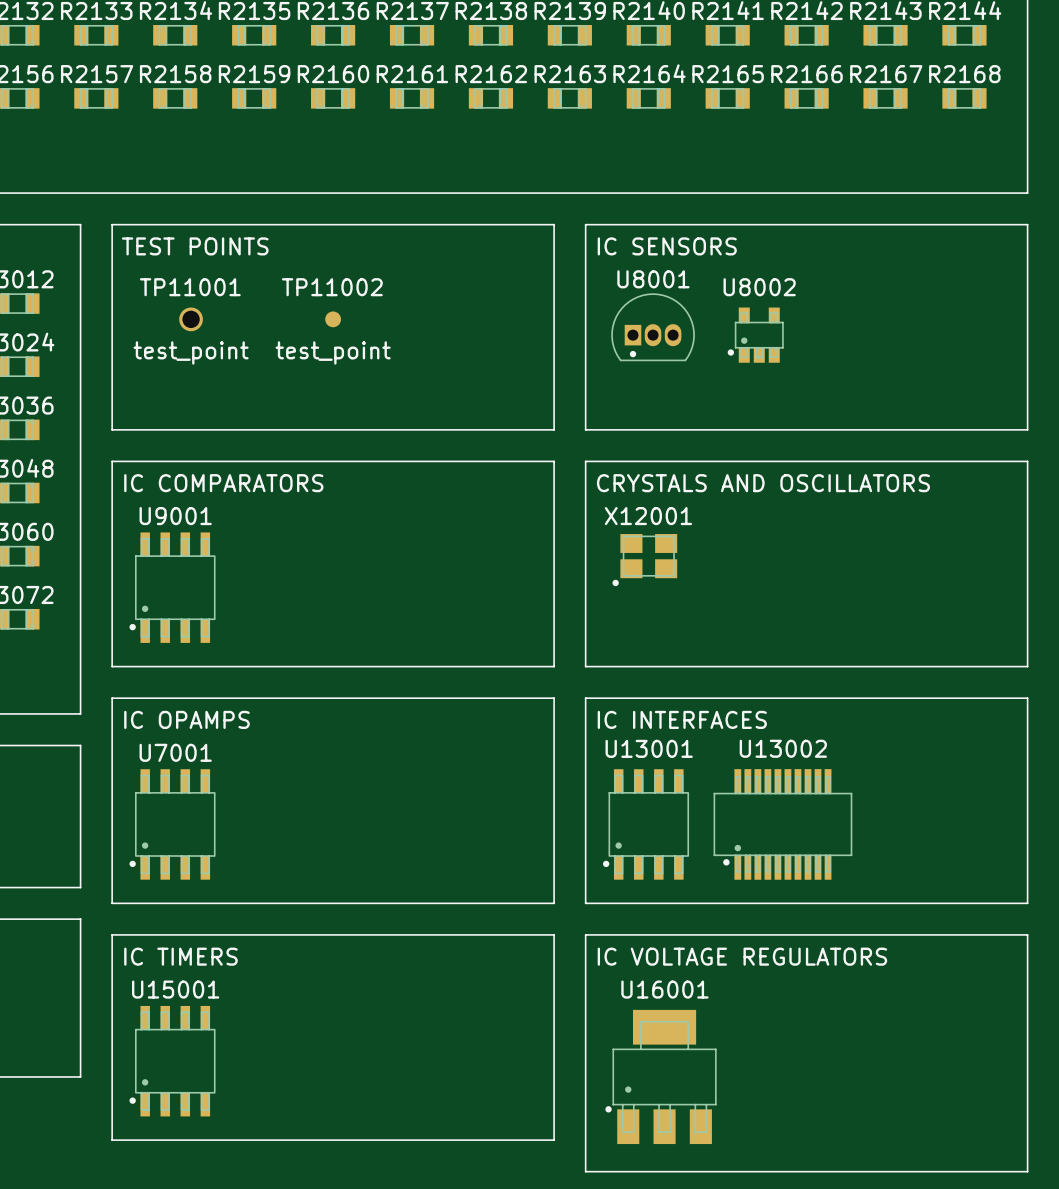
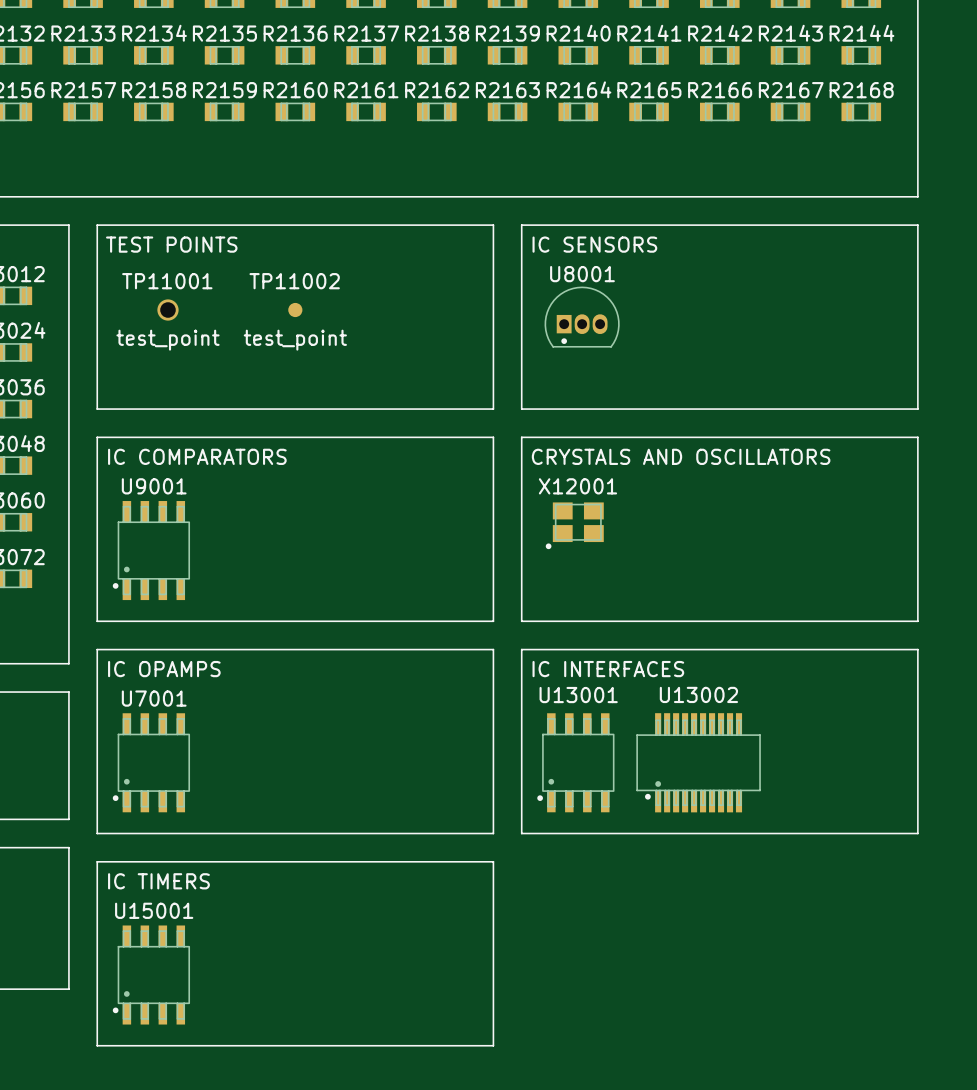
U8002: (755, 335) -> none
line: (585, 934) (1027, 934) (1027, 1171) (585, 1171) (585, 934) -> none
text: IC VOLTAGE REGULATORS (742, 956) -> none
U16001: (661, 1076) -> none

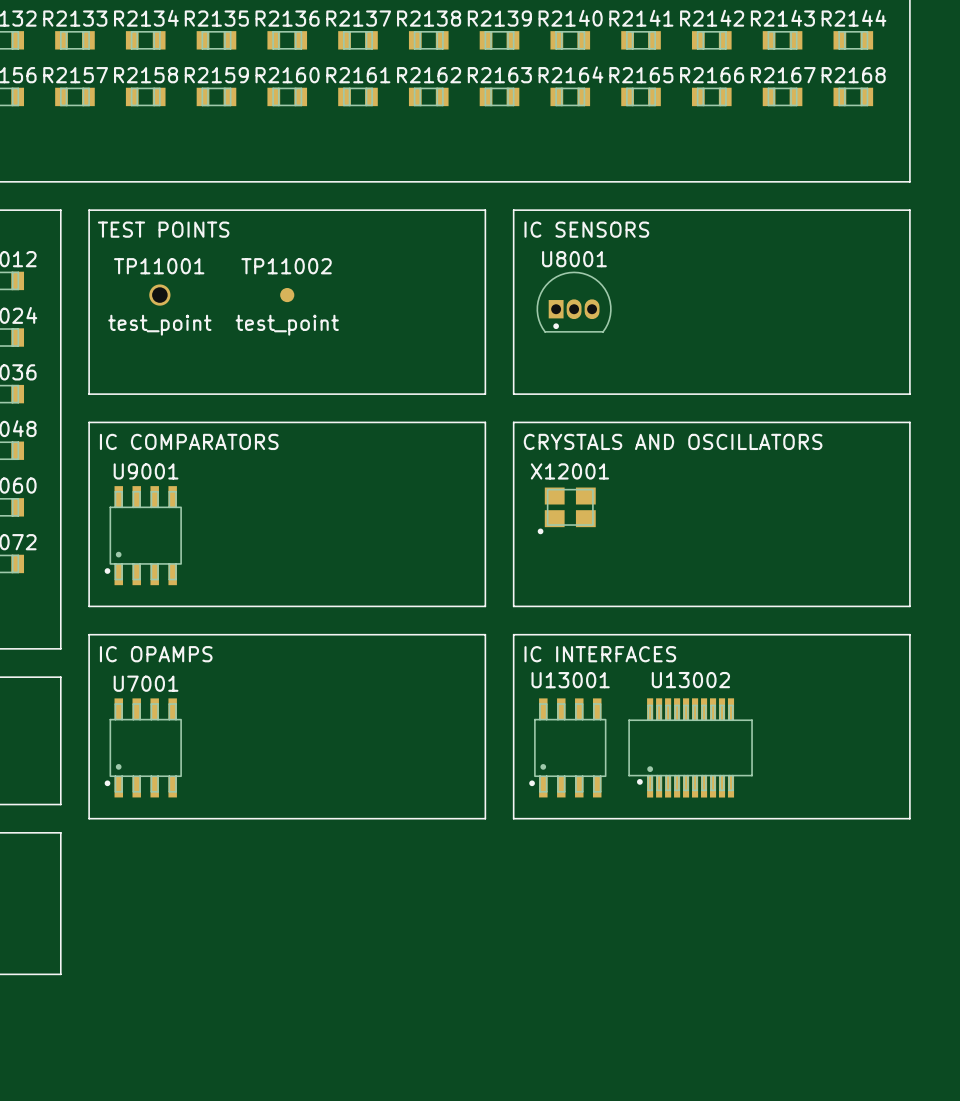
line: (97, 861) (493, 861) (493, 1045) (97, 1045) (97, 861) -> none
text: IC TIMERS (158, 881) -> none
U15001: (151, 975) -> none

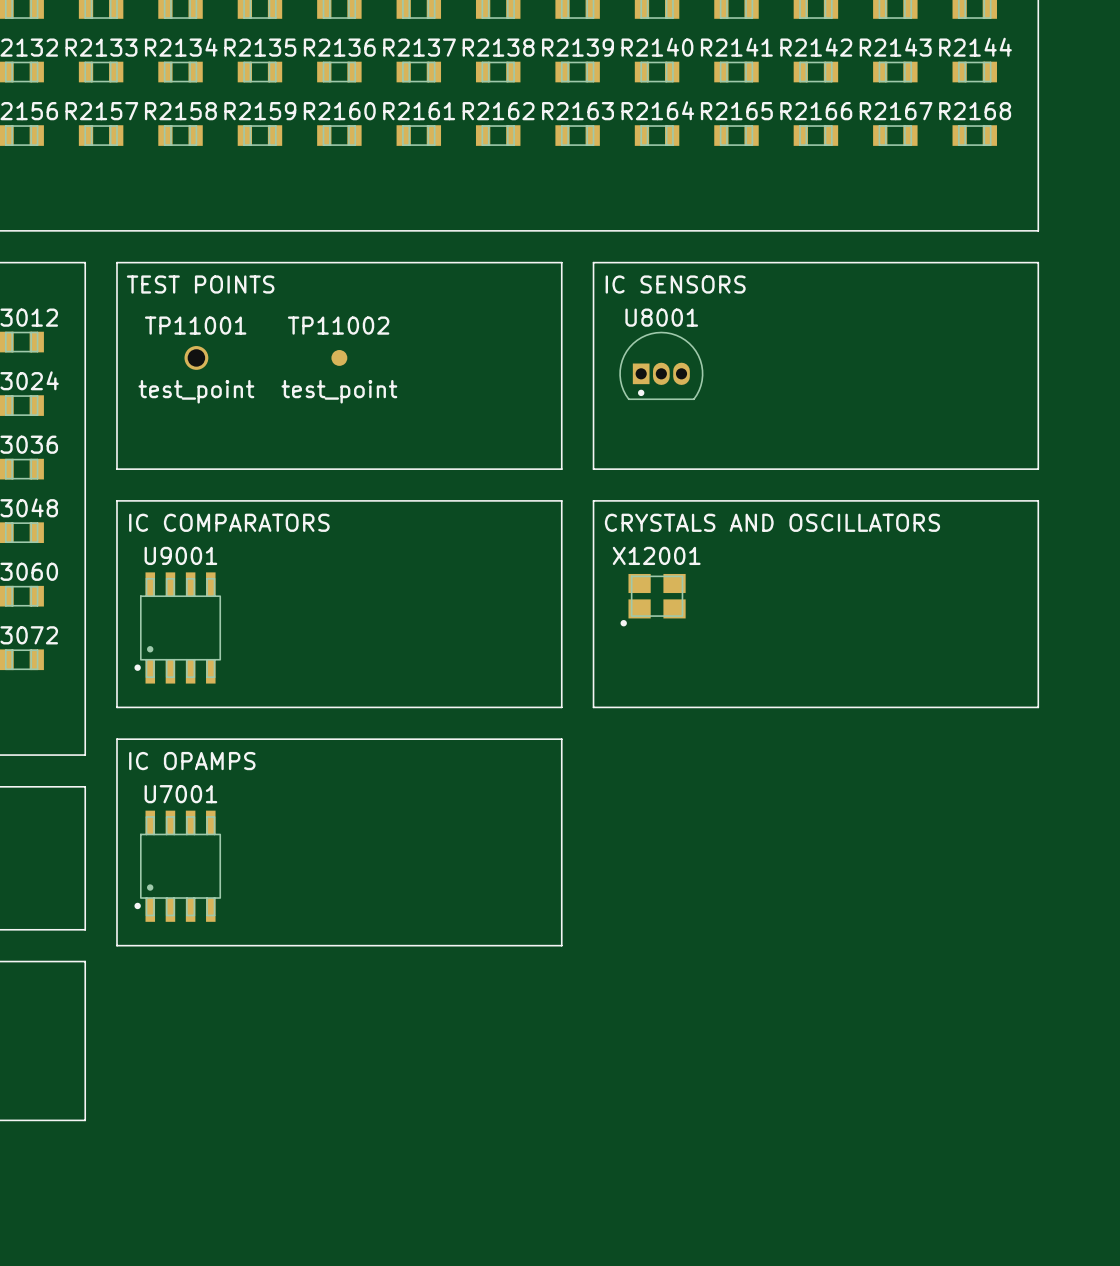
line: (513, 634) (909, 634) (909, 818) (513, 818) (513, 634) -> none
text: IC INTERFACES (600, 654) -> none
U13001: (567, 747) -> none
U13002: (690, 747) -> none

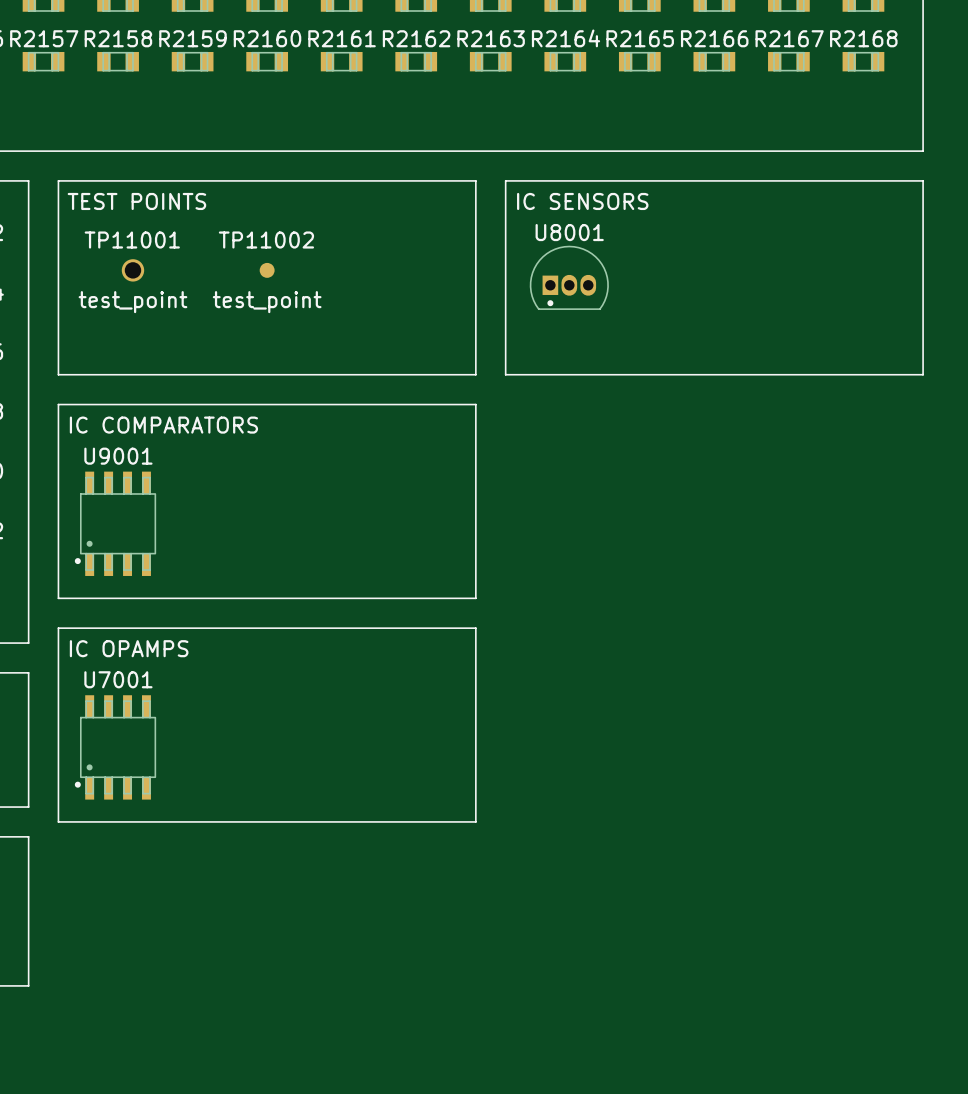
line: (593, 500) (1038, 500) (1038, 707) (593, 707) (593, 500) -> none
text: CRYSTALS AND OSCILLATORS (772, 522) -> none
X12001: (653, 600) -> none

